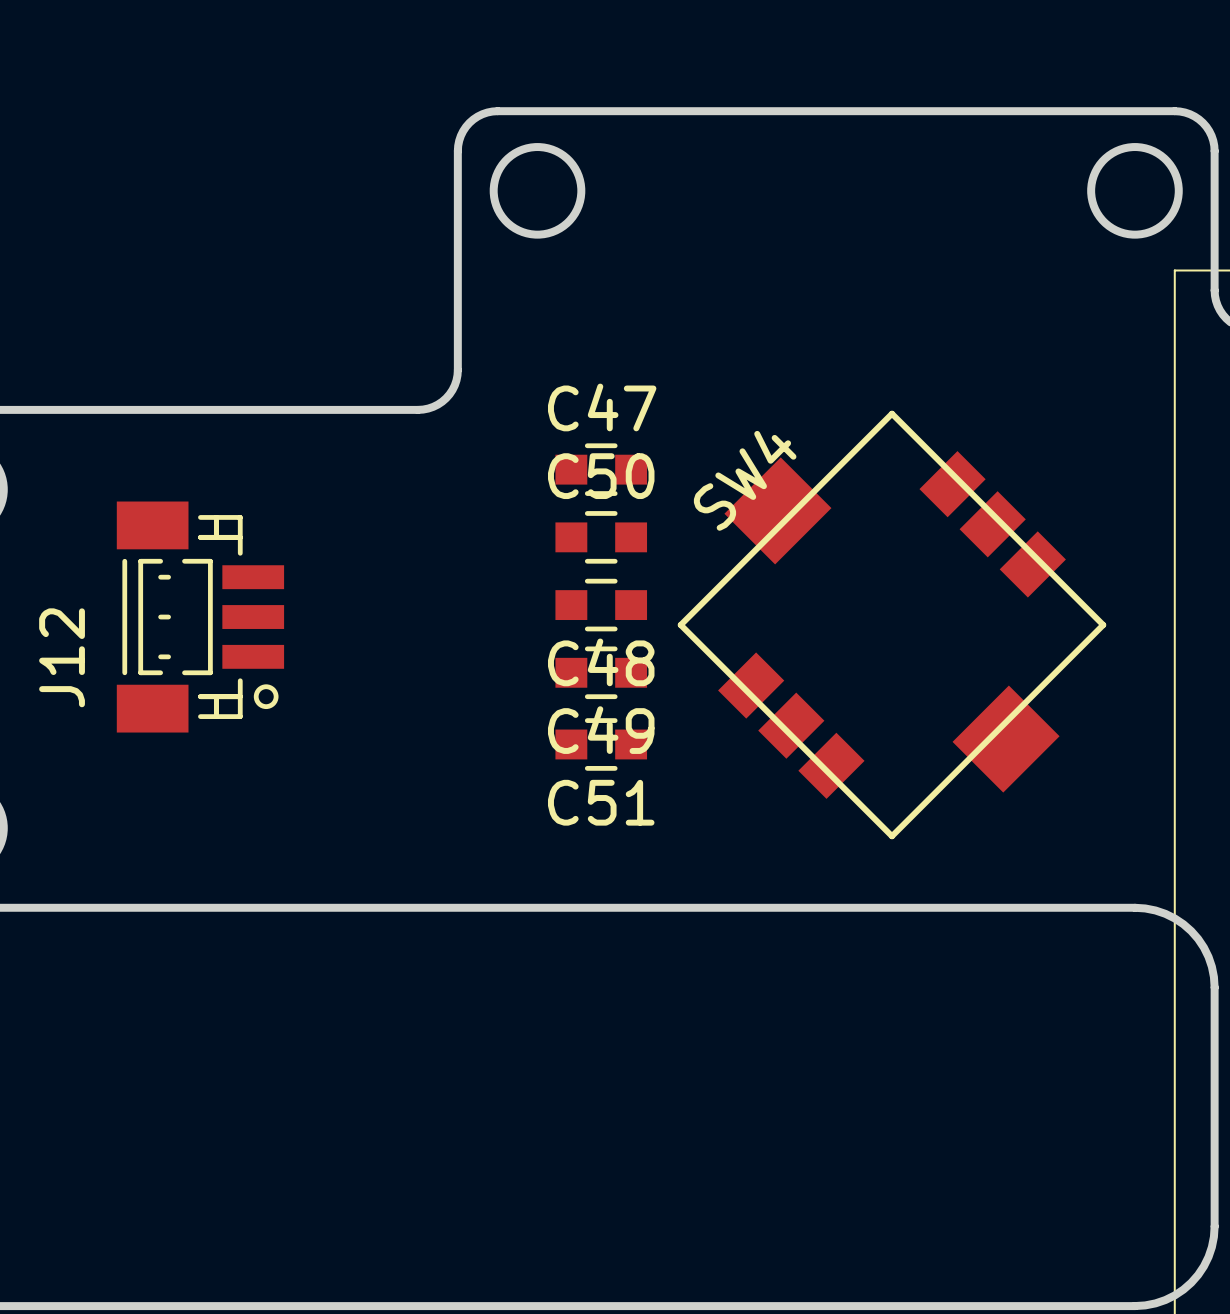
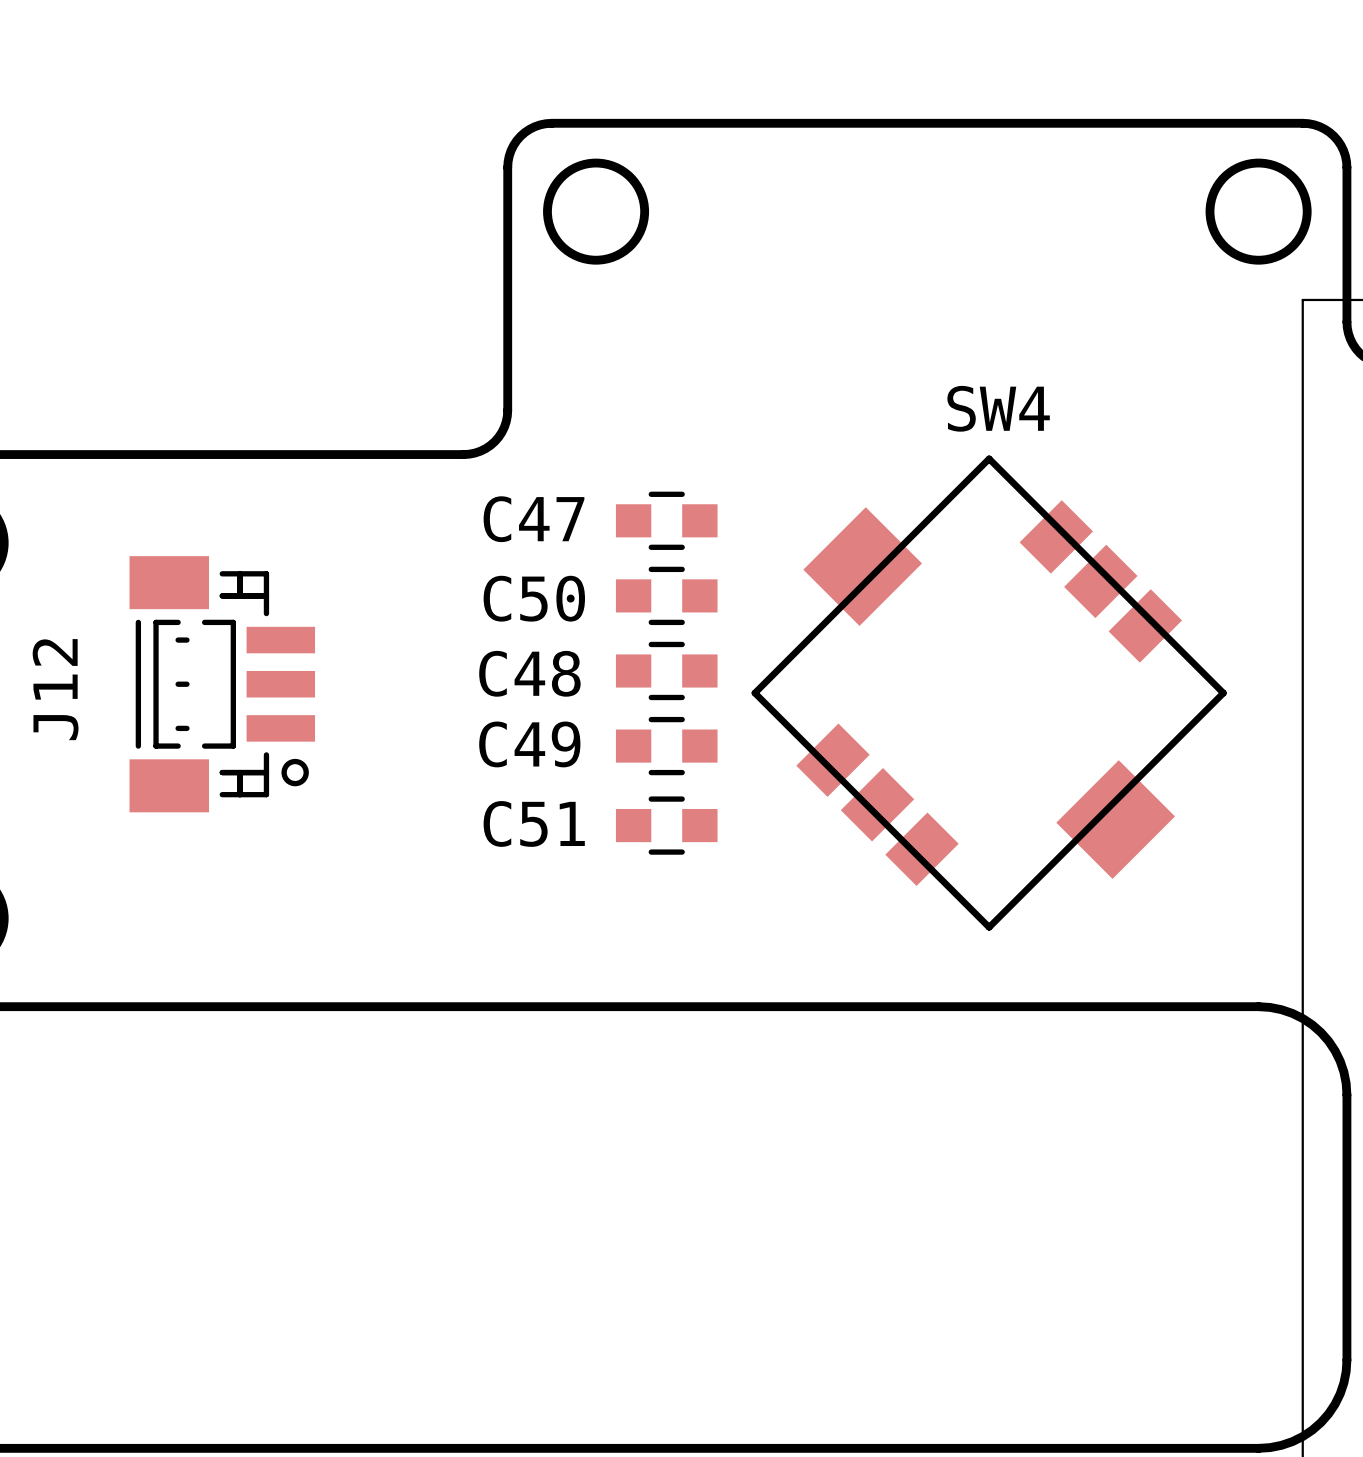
C47 name position: C47 (602, 407) -> C47 (534, 519)
C50 name position: C50 (601, 476) -> C50 (534, 598)
SW4 name rotation: 0° (745, 480) -> 45° clockwise (998, 408)
SW4 name position: SW4 (745, 480) -> SW4 (998, 408)
J12 name position: J12 (62, 657) -> J12 (55, 689)
C48 name position: C48 (601, 662) -> C48 (529, 673)
C49 name position: C49 (601, 730) -> C49 (529, 744)
C51 name position: C51 (601, 802) -> C51 (534, 823)

